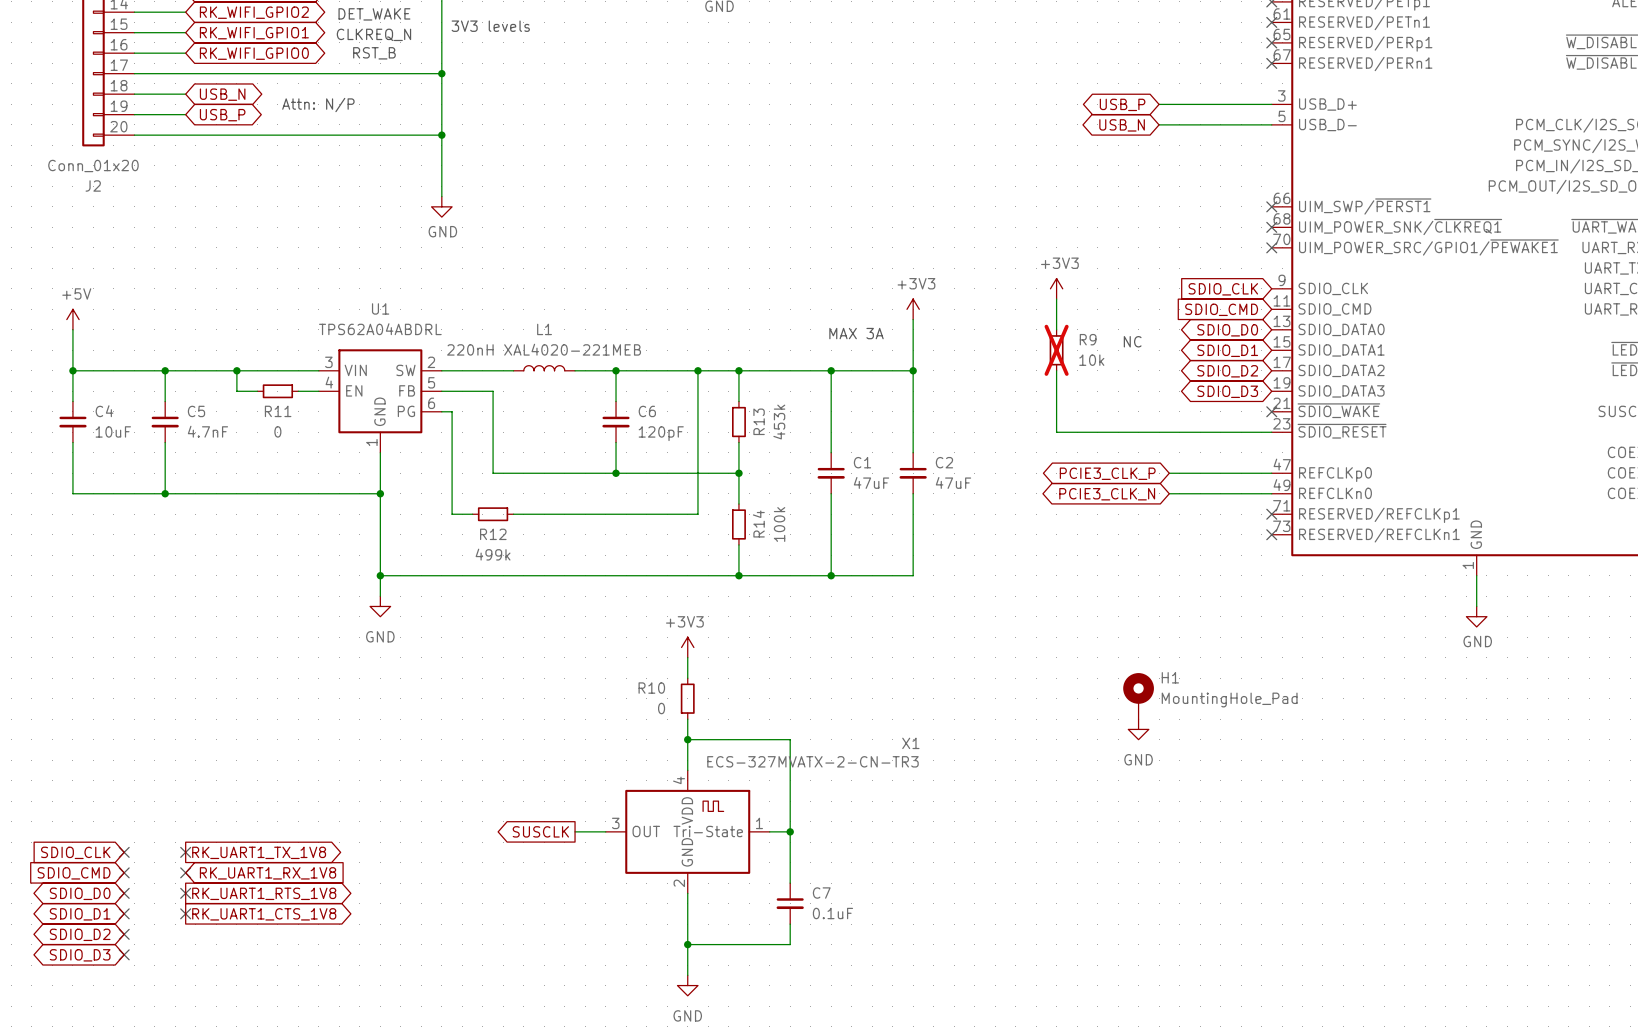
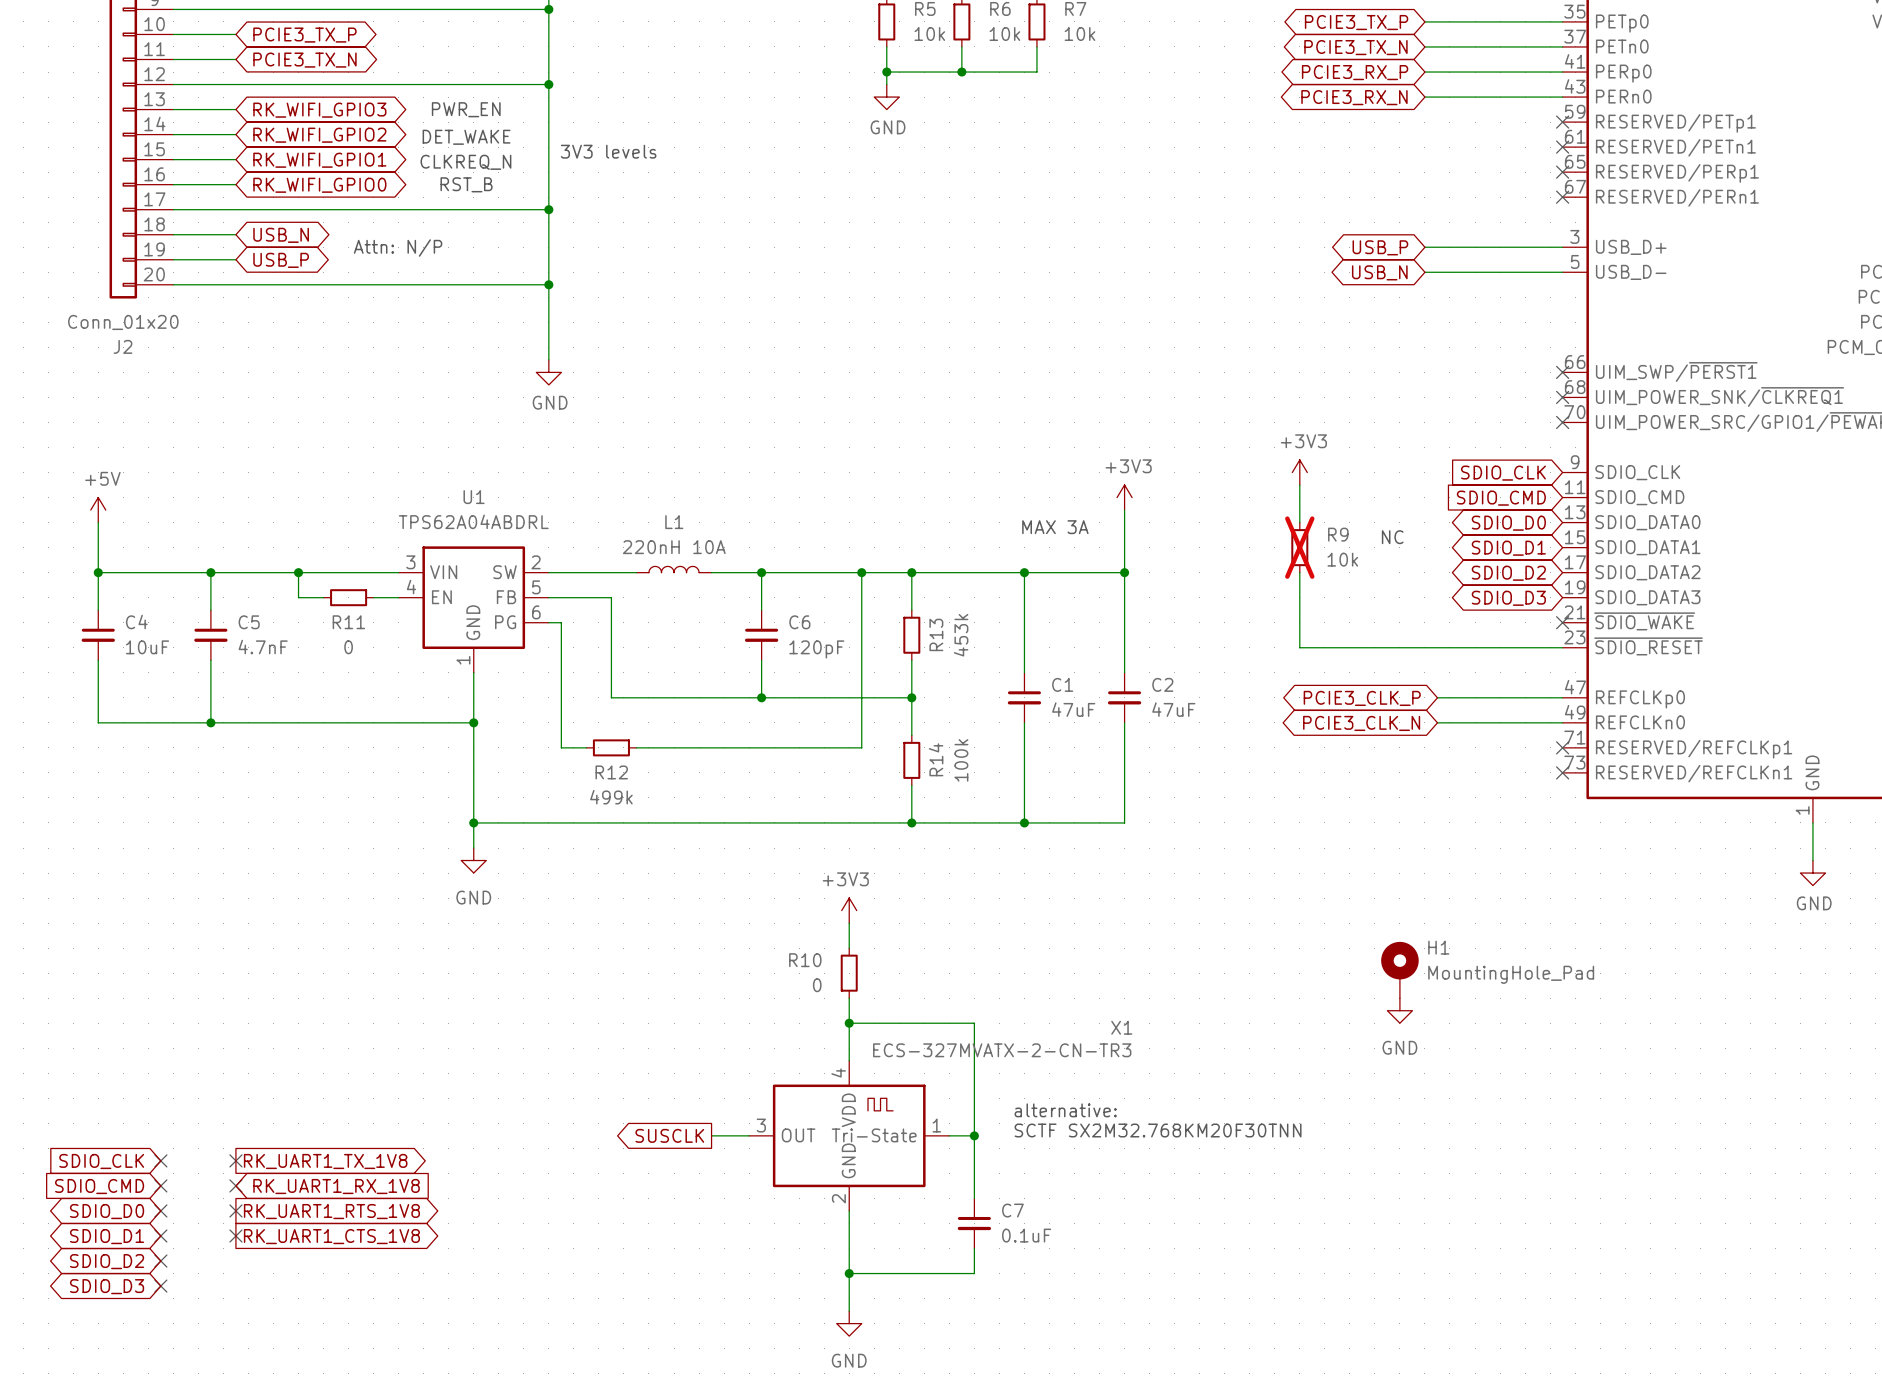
L1 value: 220nH XAL4020-221MEB (544, 349) -> 220nH 10A (674, 547)
text: none -> alternative: (1065, 1110)
text: none -> SCTF SX2M32.768KM20F30TNN (1158, 1130)

